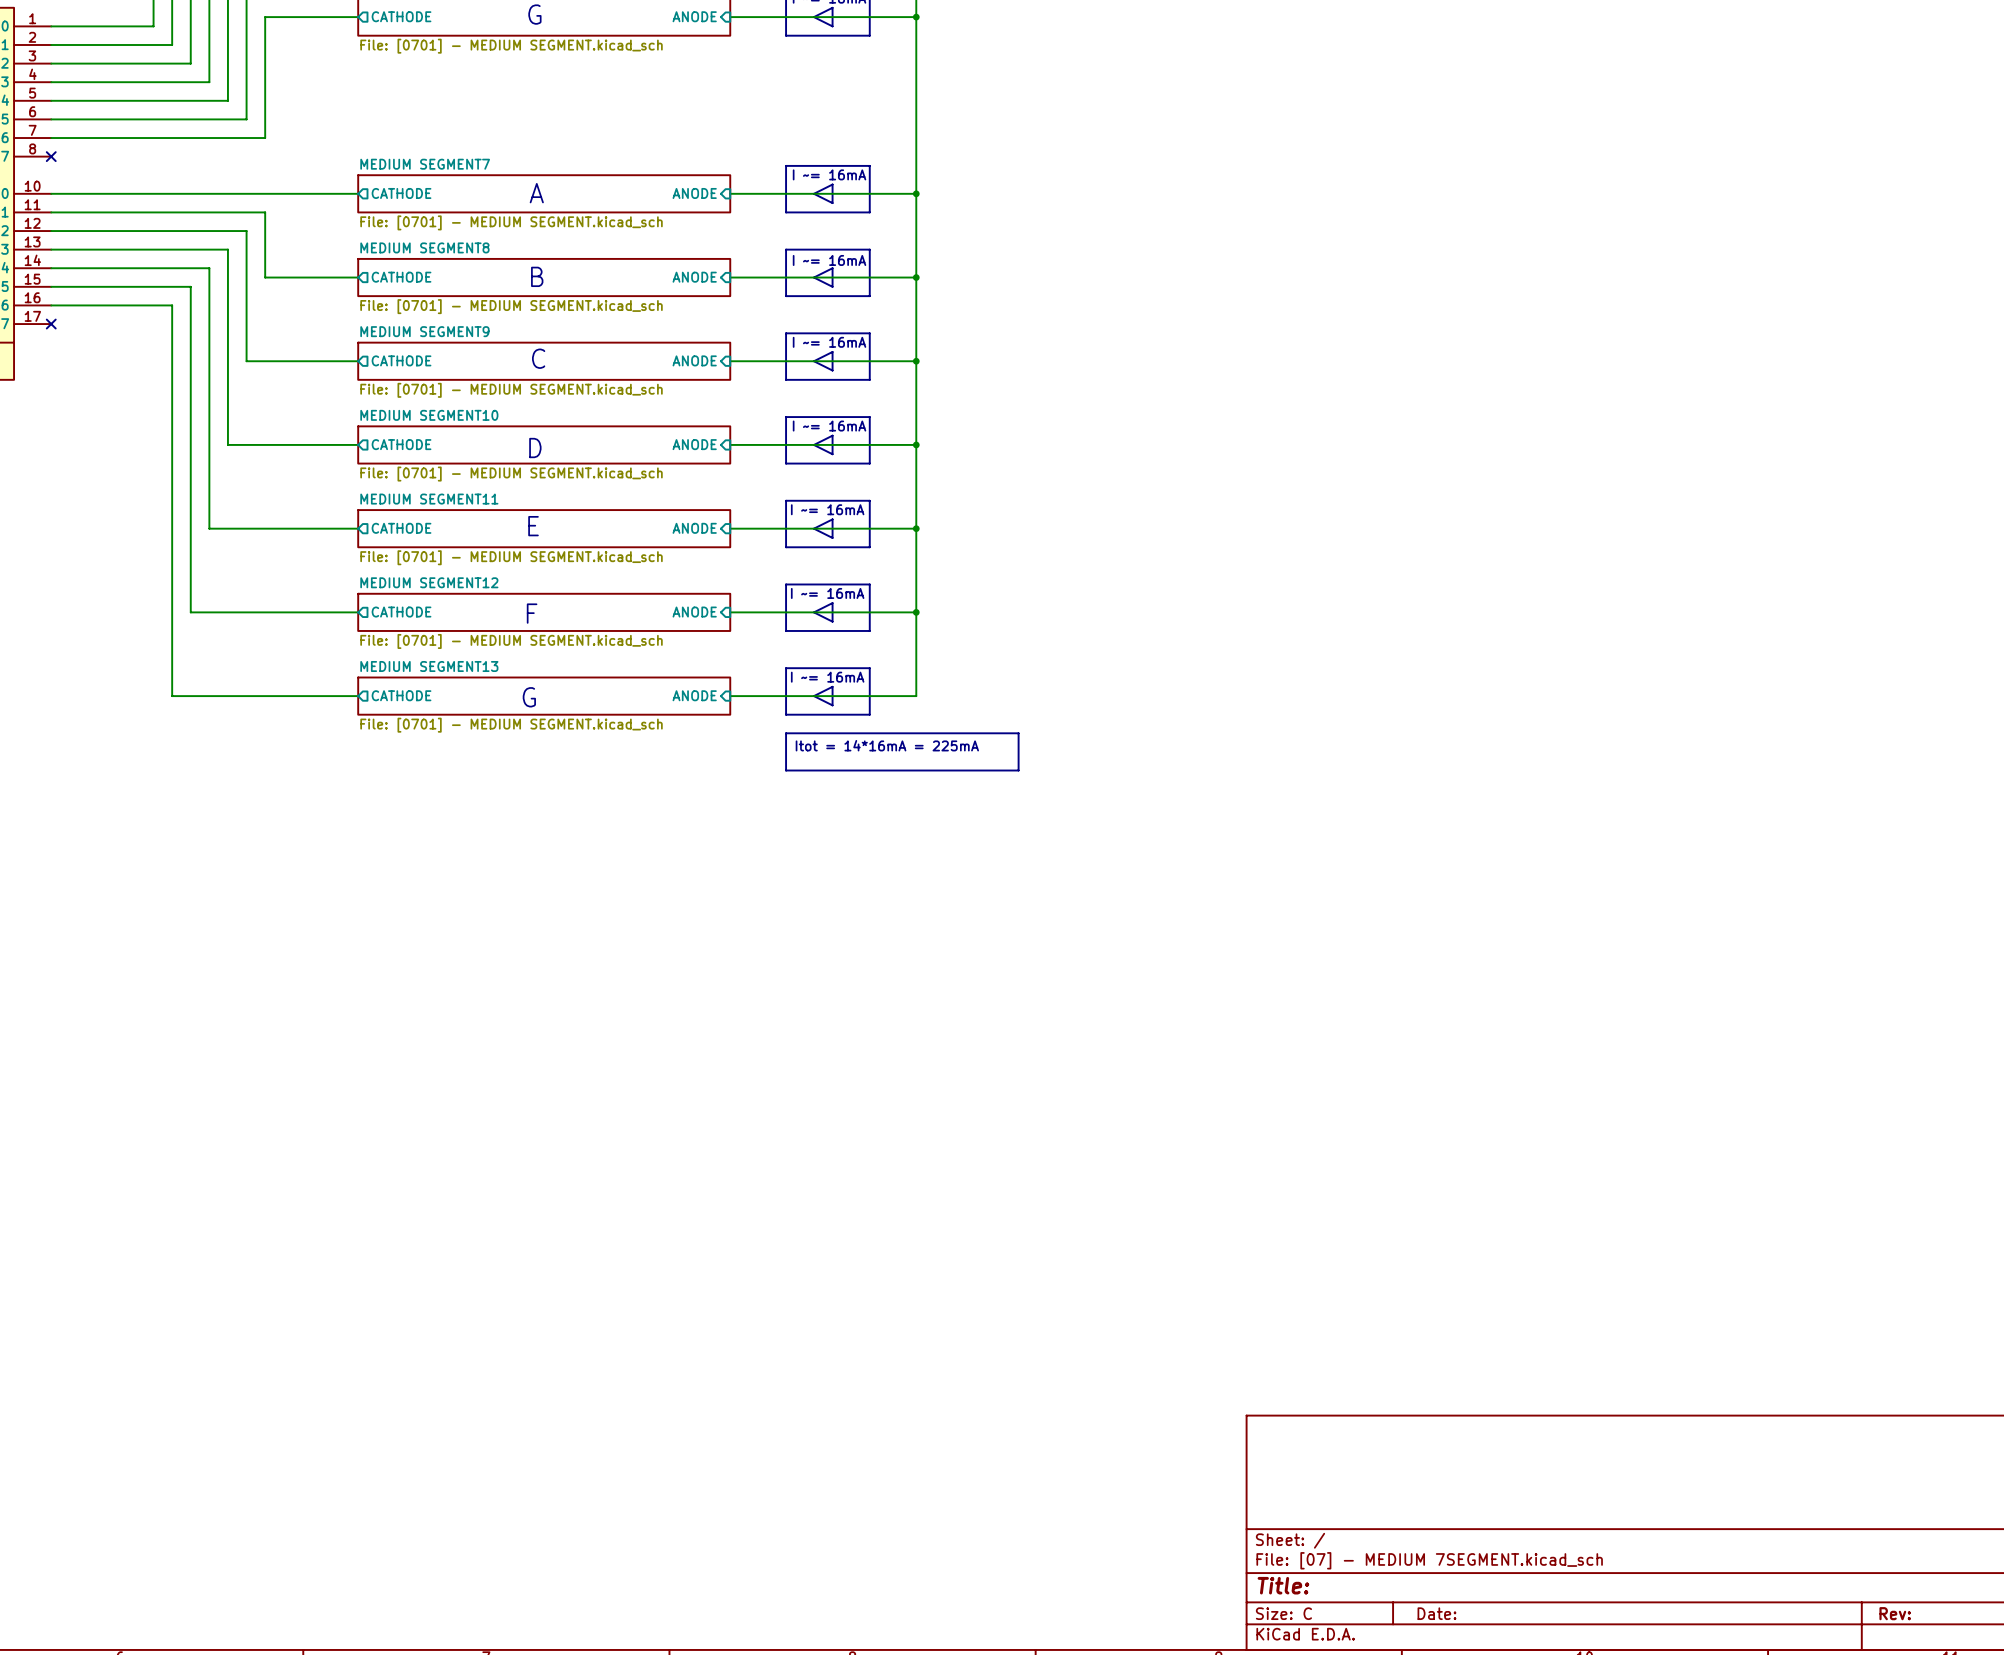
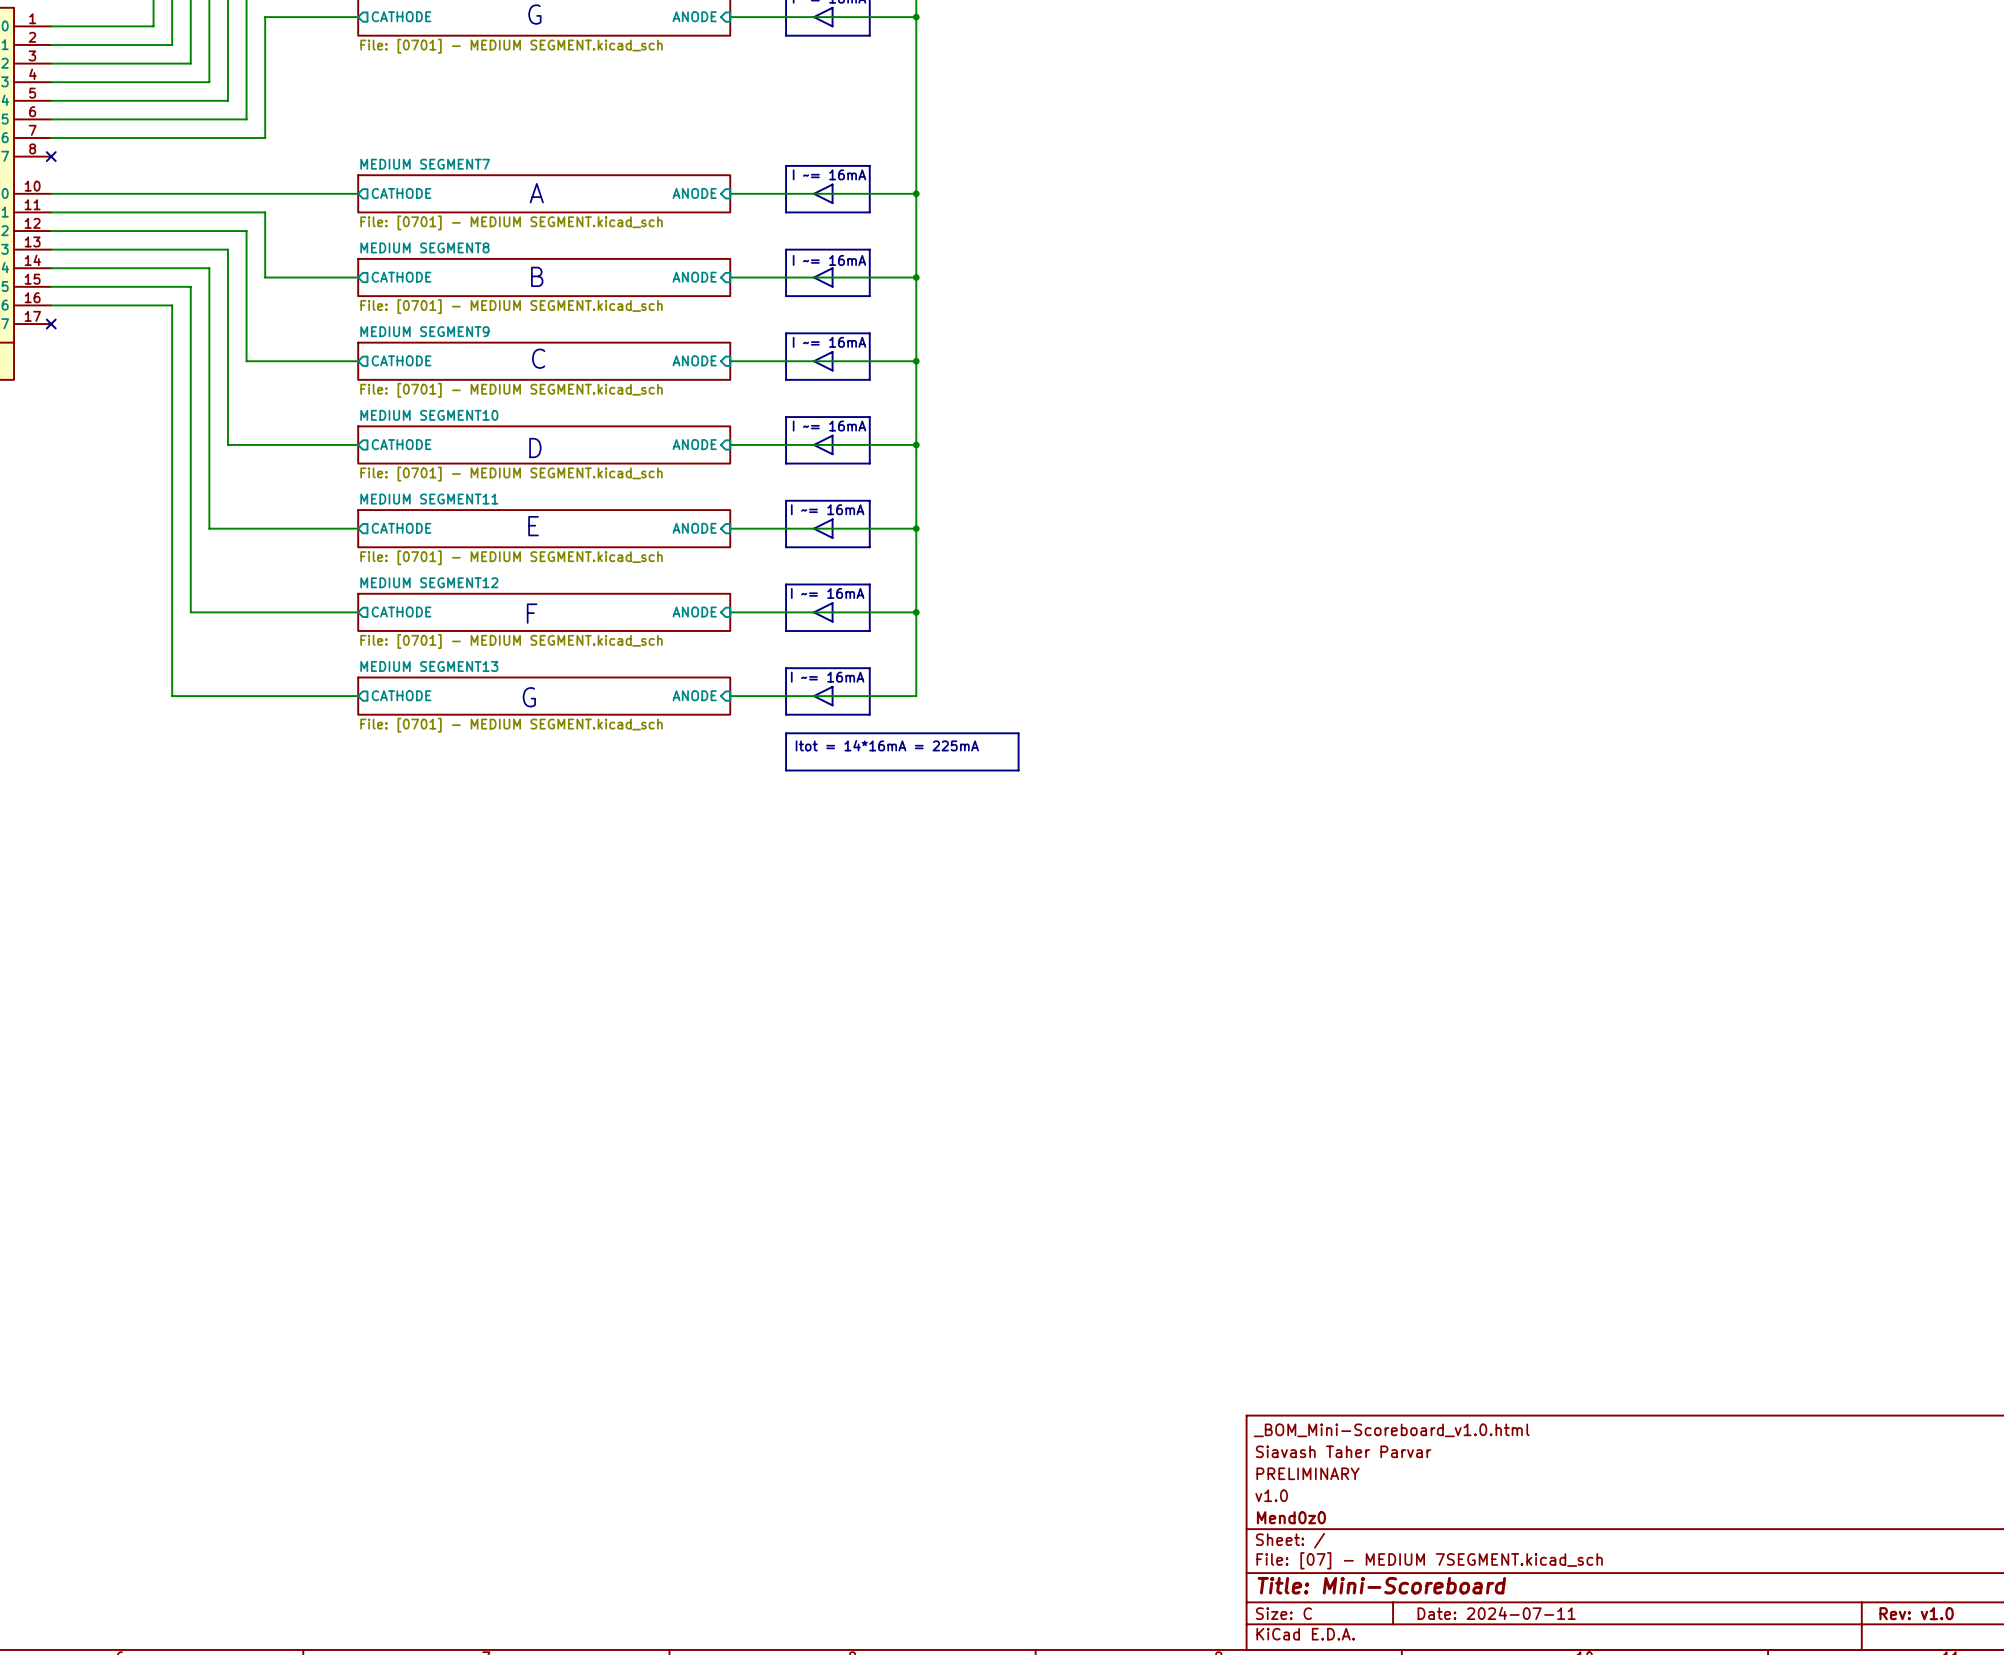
title block: none -> _BOM_Mini-Scoreboard_v1.0.html (1391, 1430)
title block: none -> Siavash Taher Parvar (1343, 1451)
title block: none -> PRELIMINARY (1308, 1473)
title block: none -> v1.0 (1271, 1495)
title block: none -> Mend0z0 (1291, 1517)
title block: Title: (1283, 1585) -> Title: Mini-Scoreboard (1381, 1585)
title block: Date: (1436, 1613) -> Date: 2024-07-11 (1496, 1613)
title block: Rev: (1895, 1613) -> Rev: v1.0 (1916, 1613)

